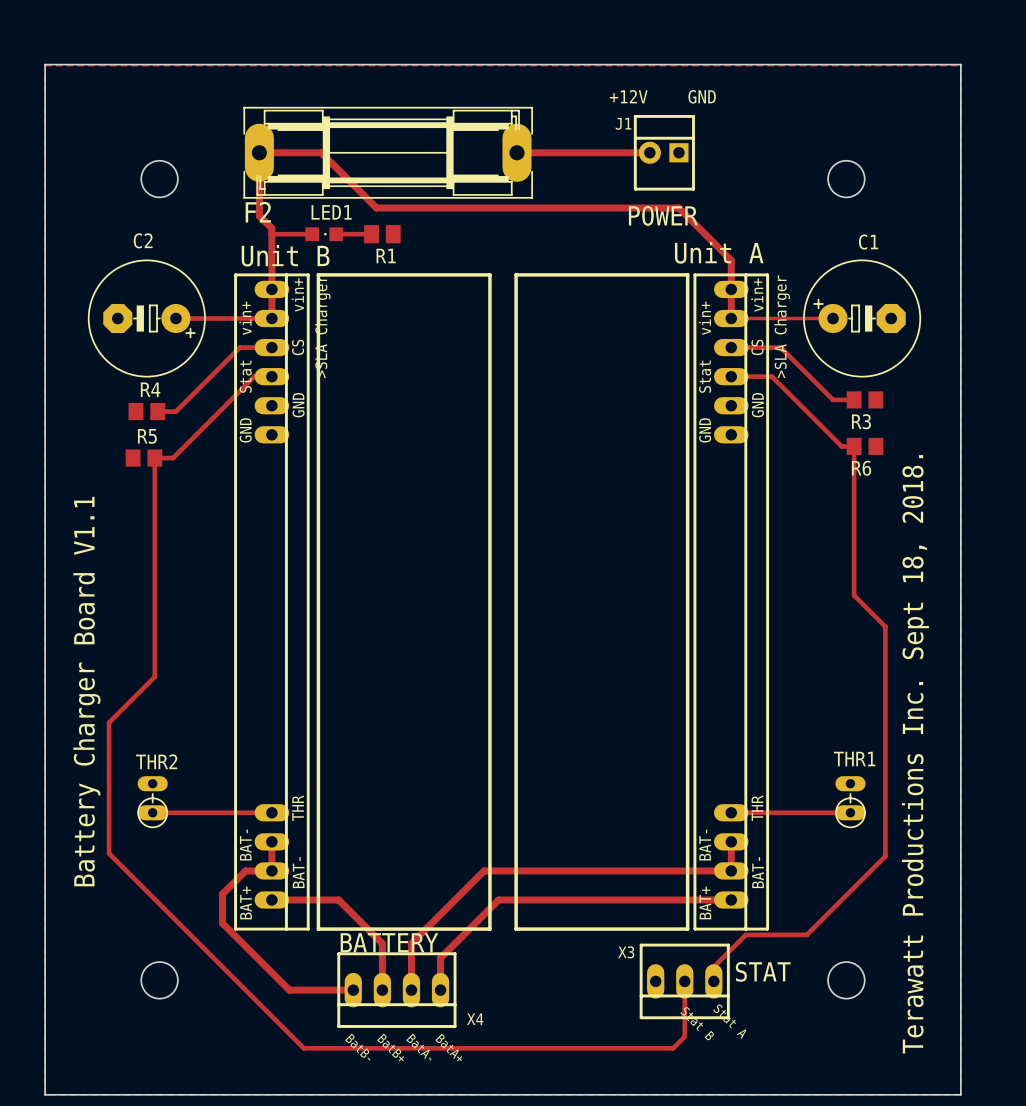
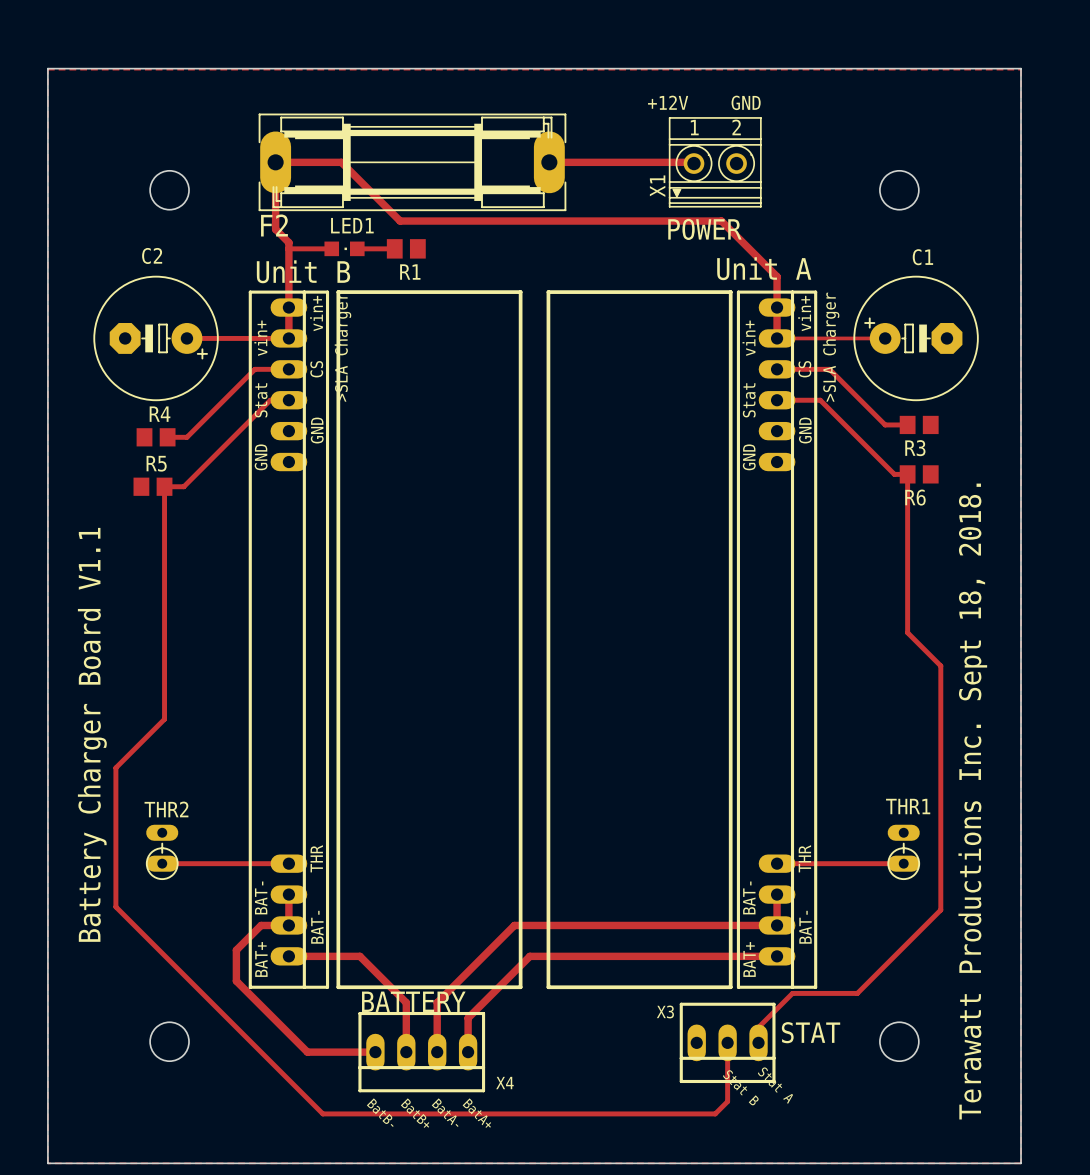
J1: (664, 152) -> none
X1: none -> (715, 162)

